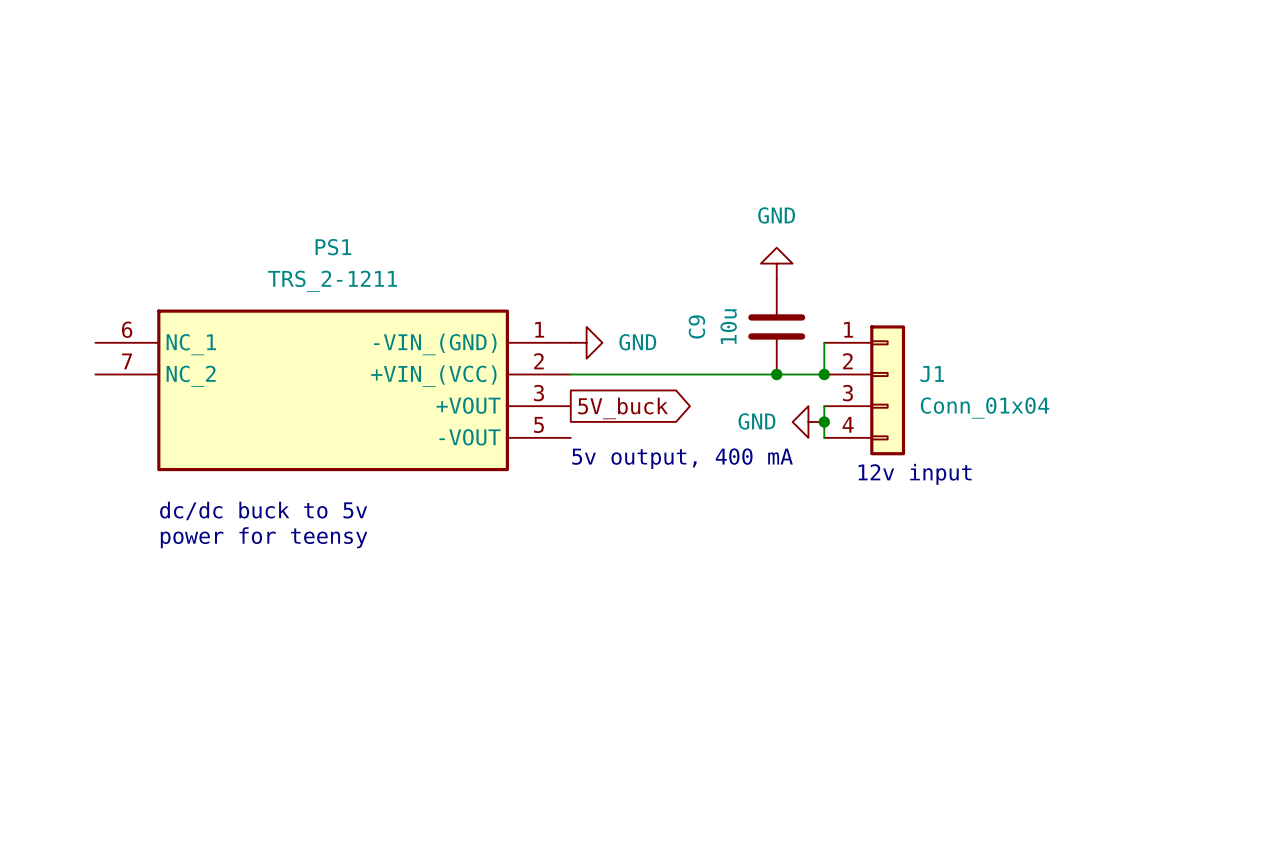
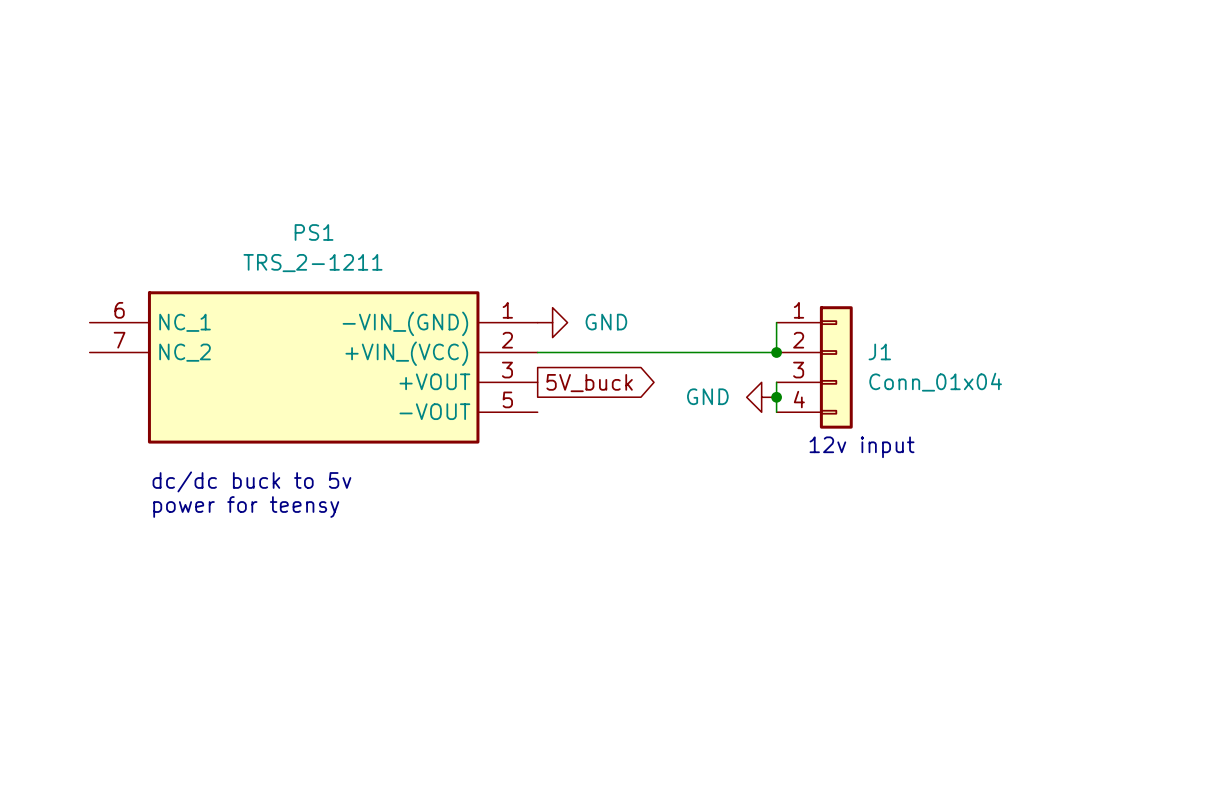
power symbol: GND (776, 263) -> none
C9: 10u (776, 326) -> none
junction: (776, 374) -> none
text: 5v output, 400 mA (682, 458) -> none

